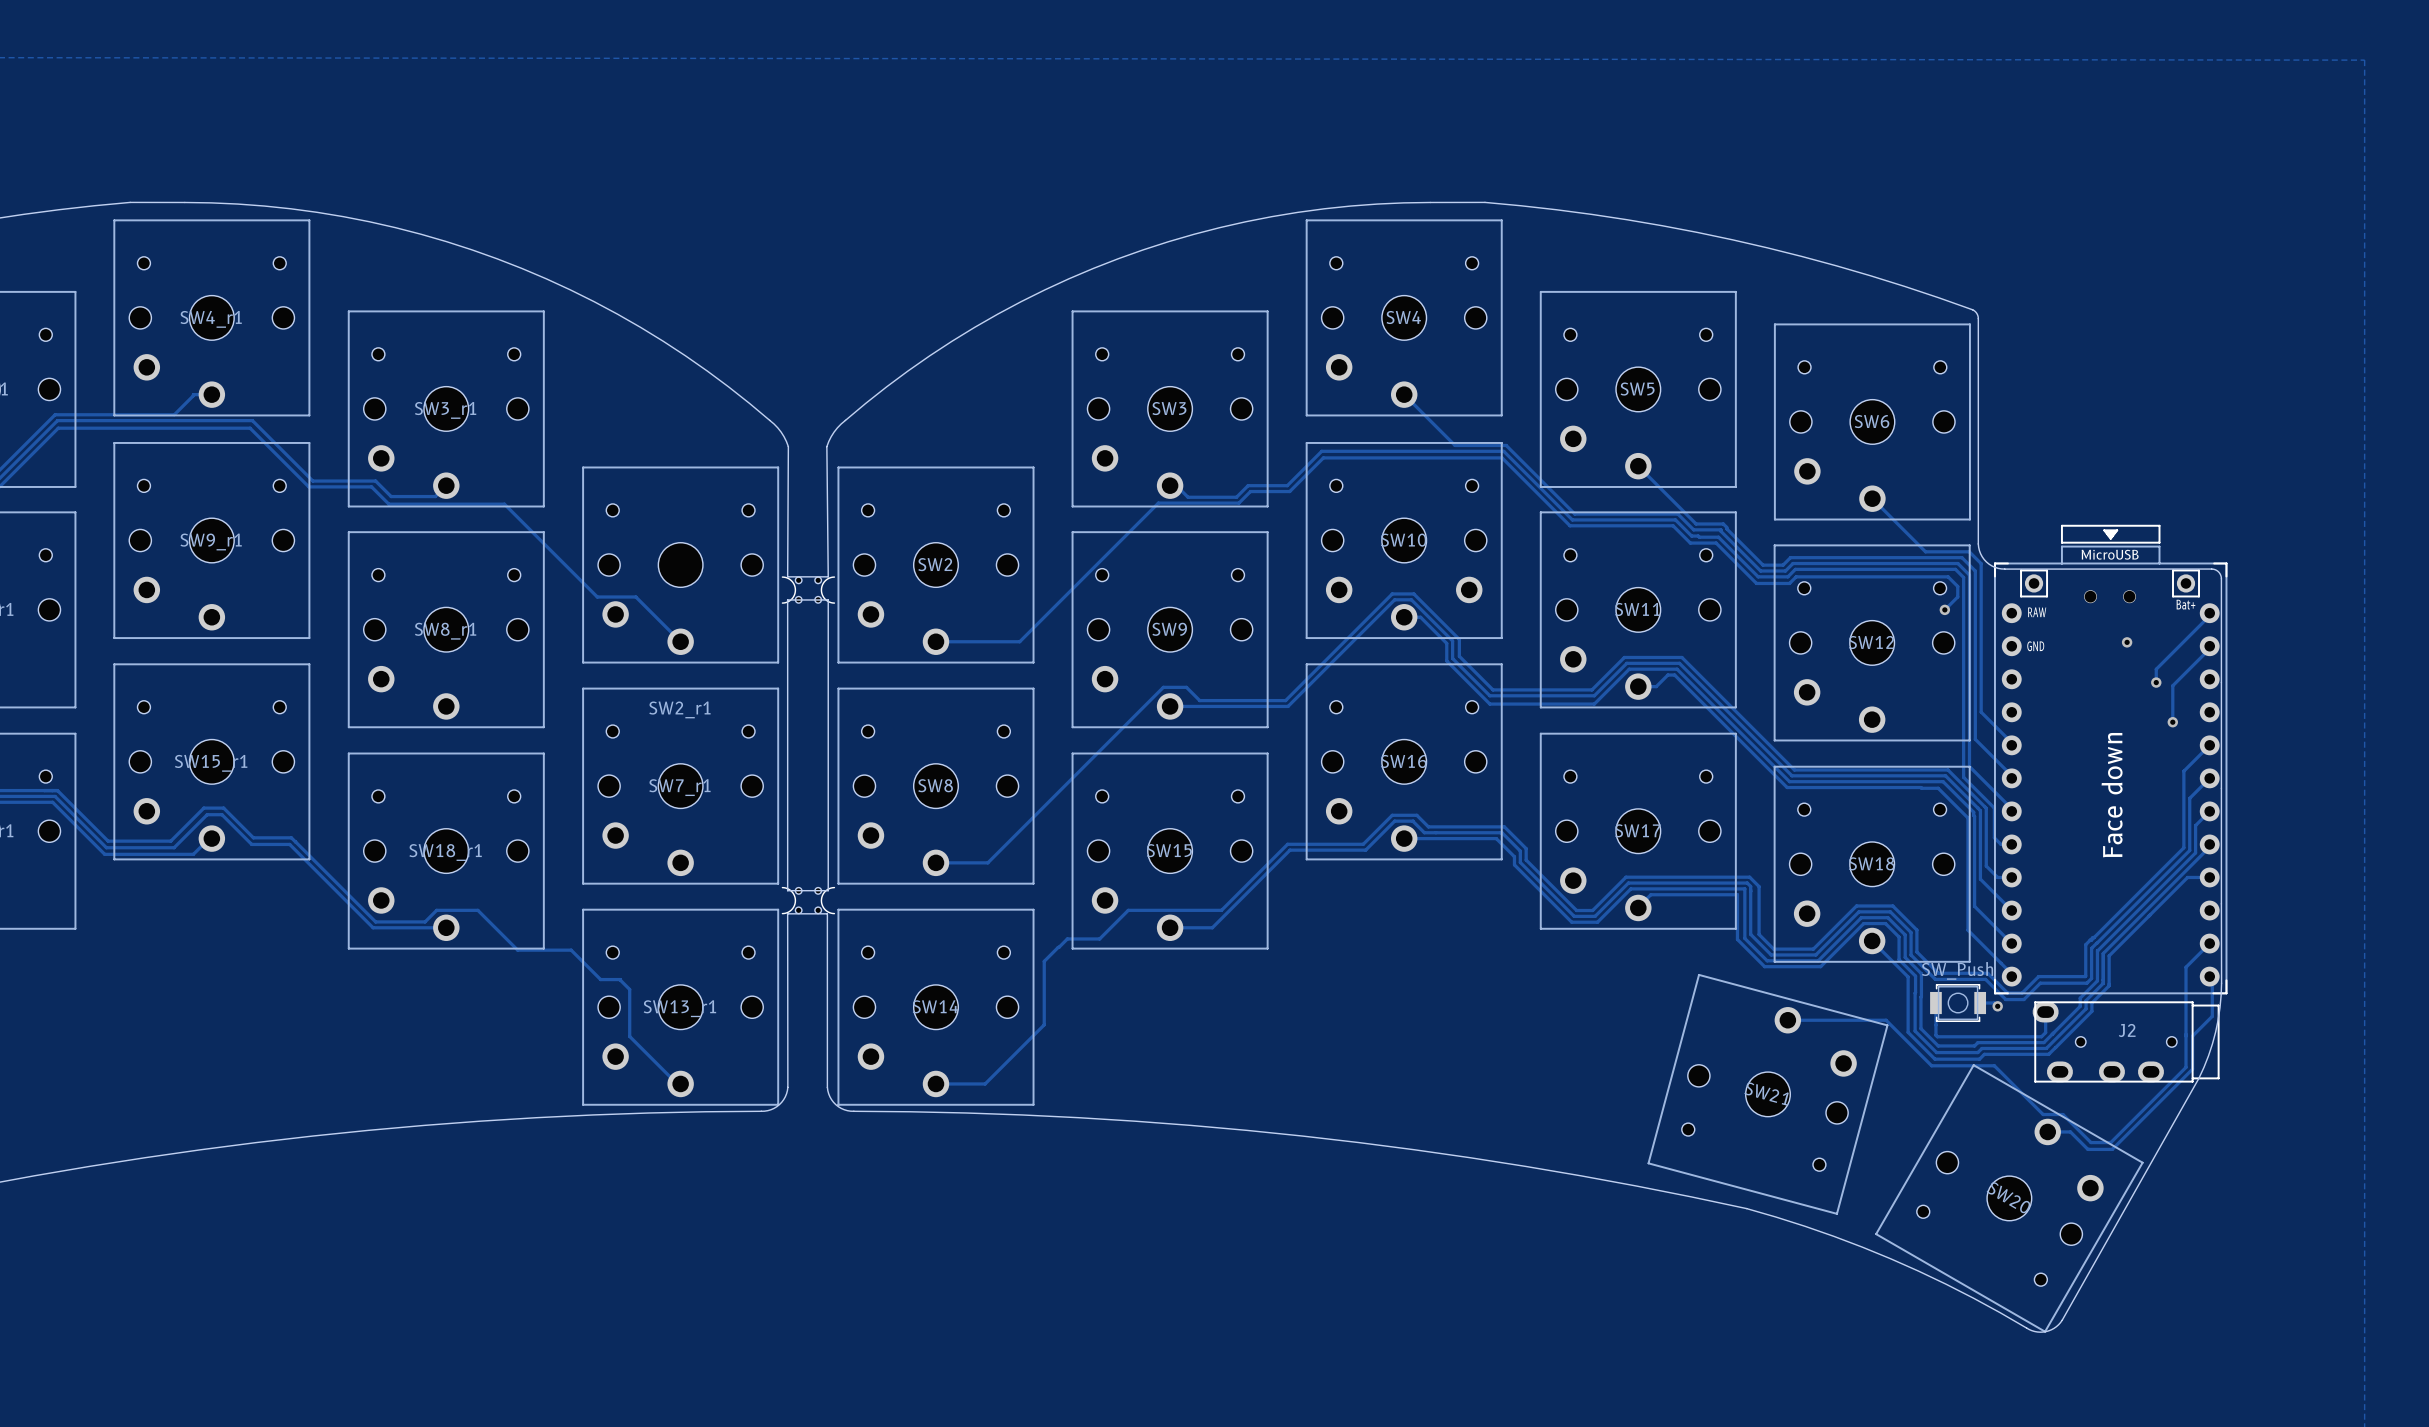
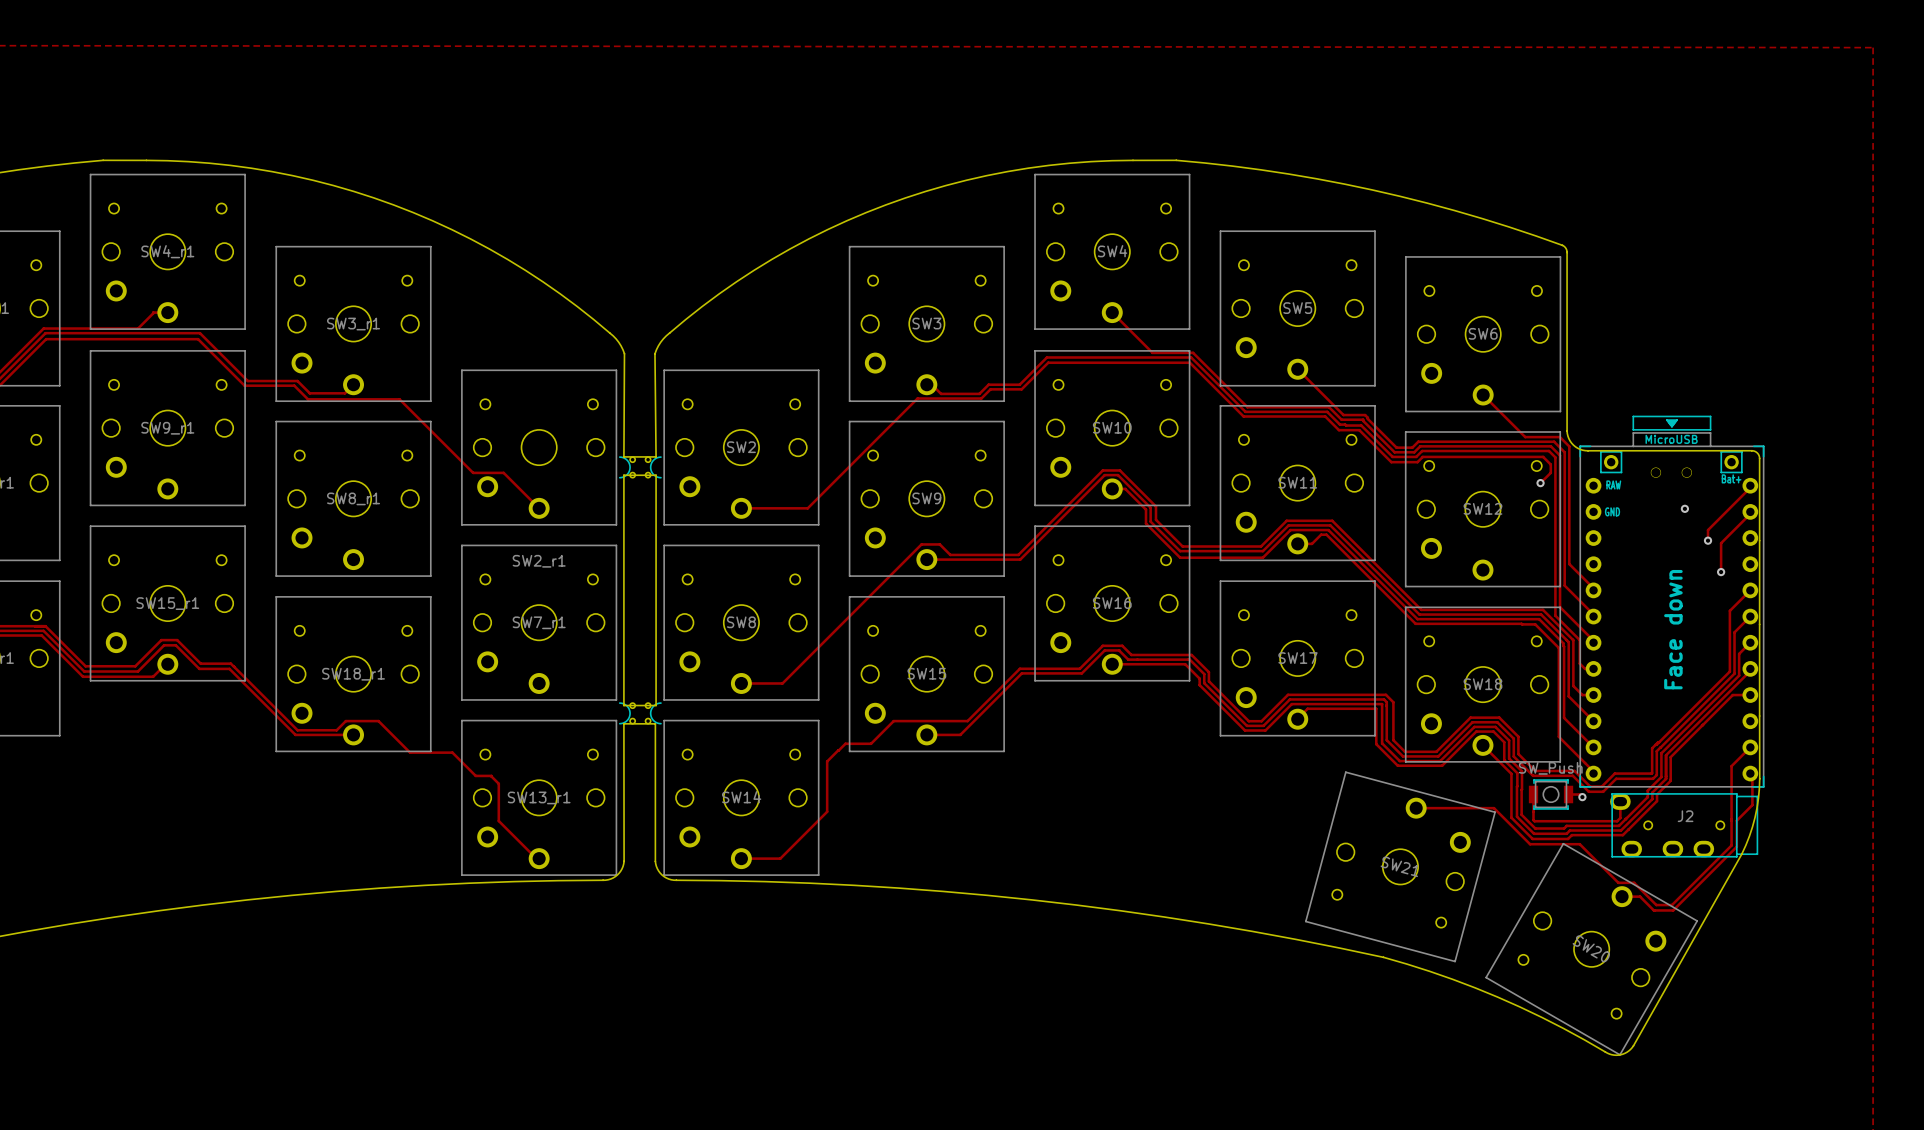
SW10 footprint: [1305, 441, 1503, 640] -> [1034, 350, 1191, 507]

